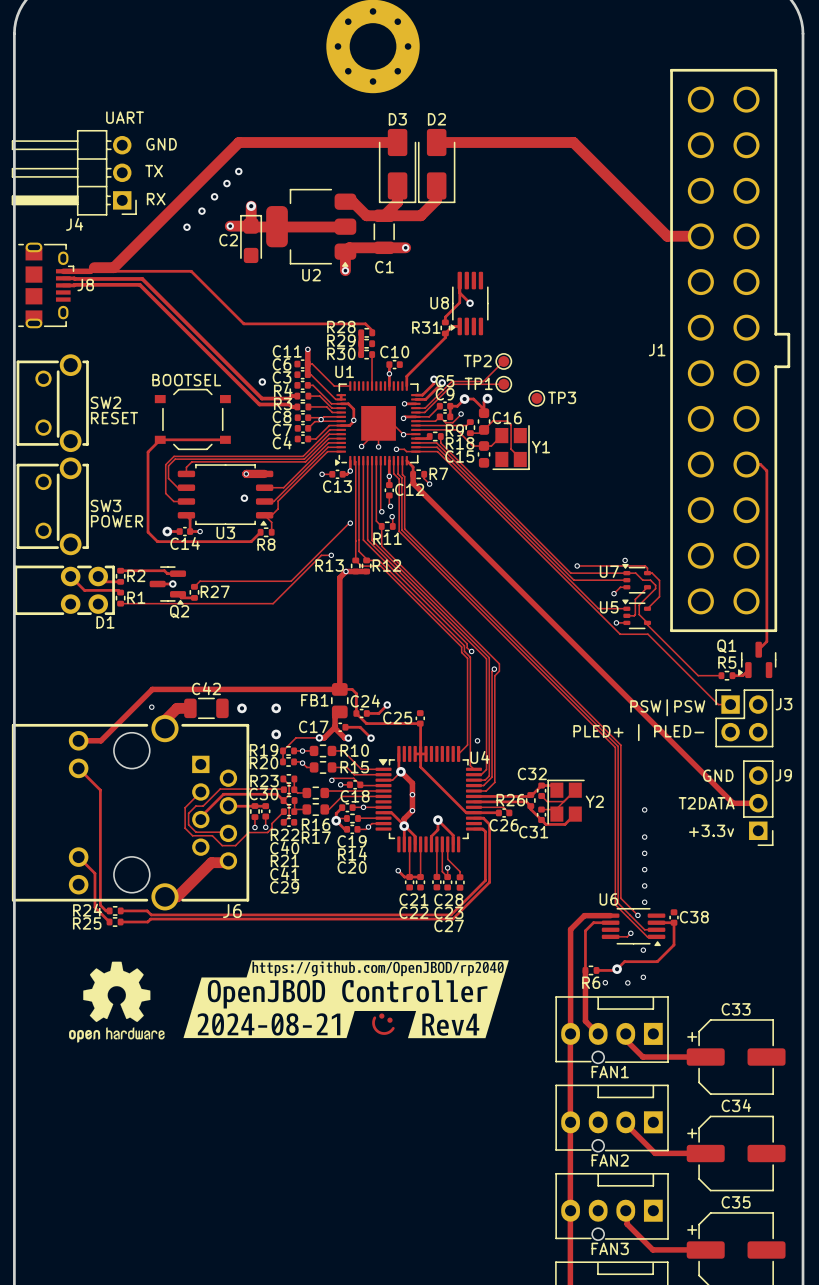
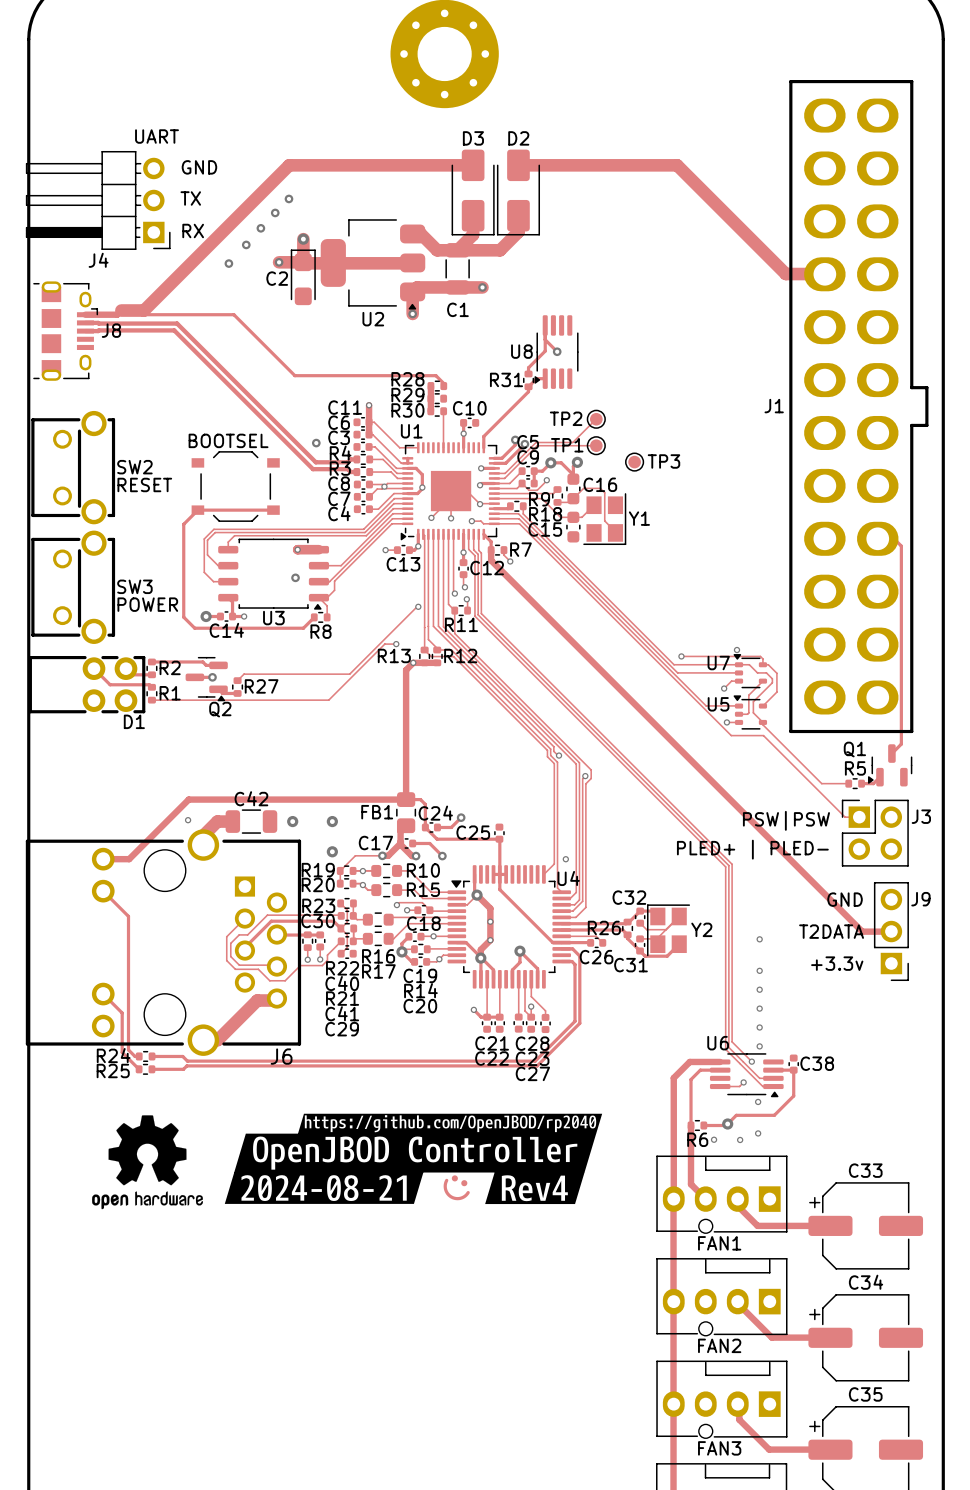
J1 footprint: [670, 68, 791, 633] -> [789, 79, 929, 734]

